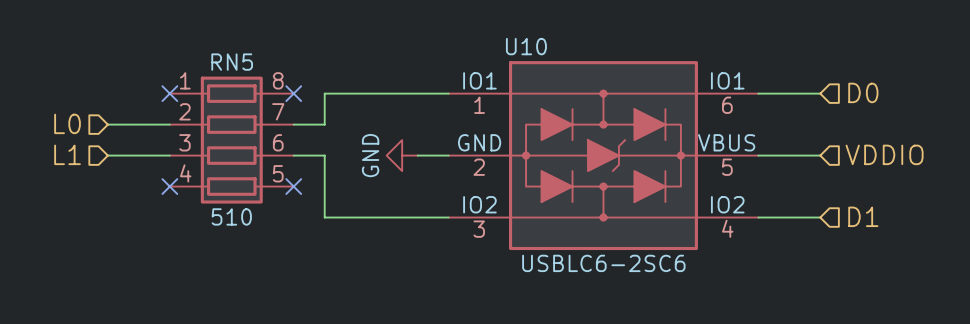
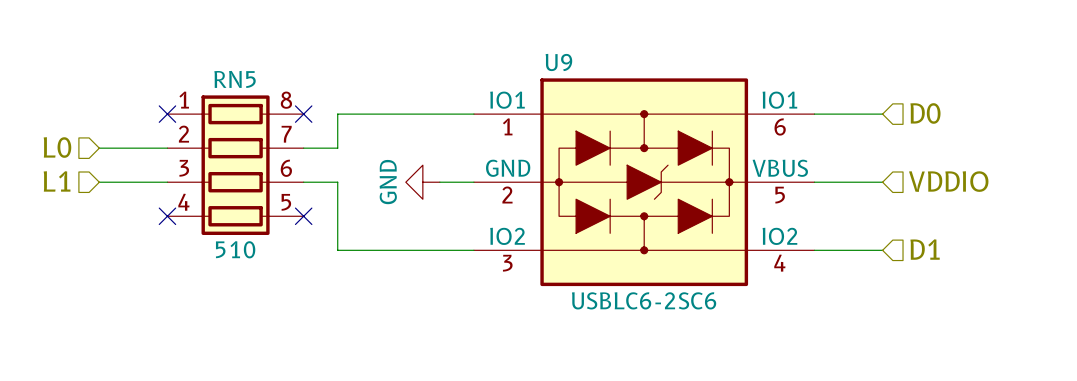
U10 name: U10 (526, 46) -> U9 (558, 62)

